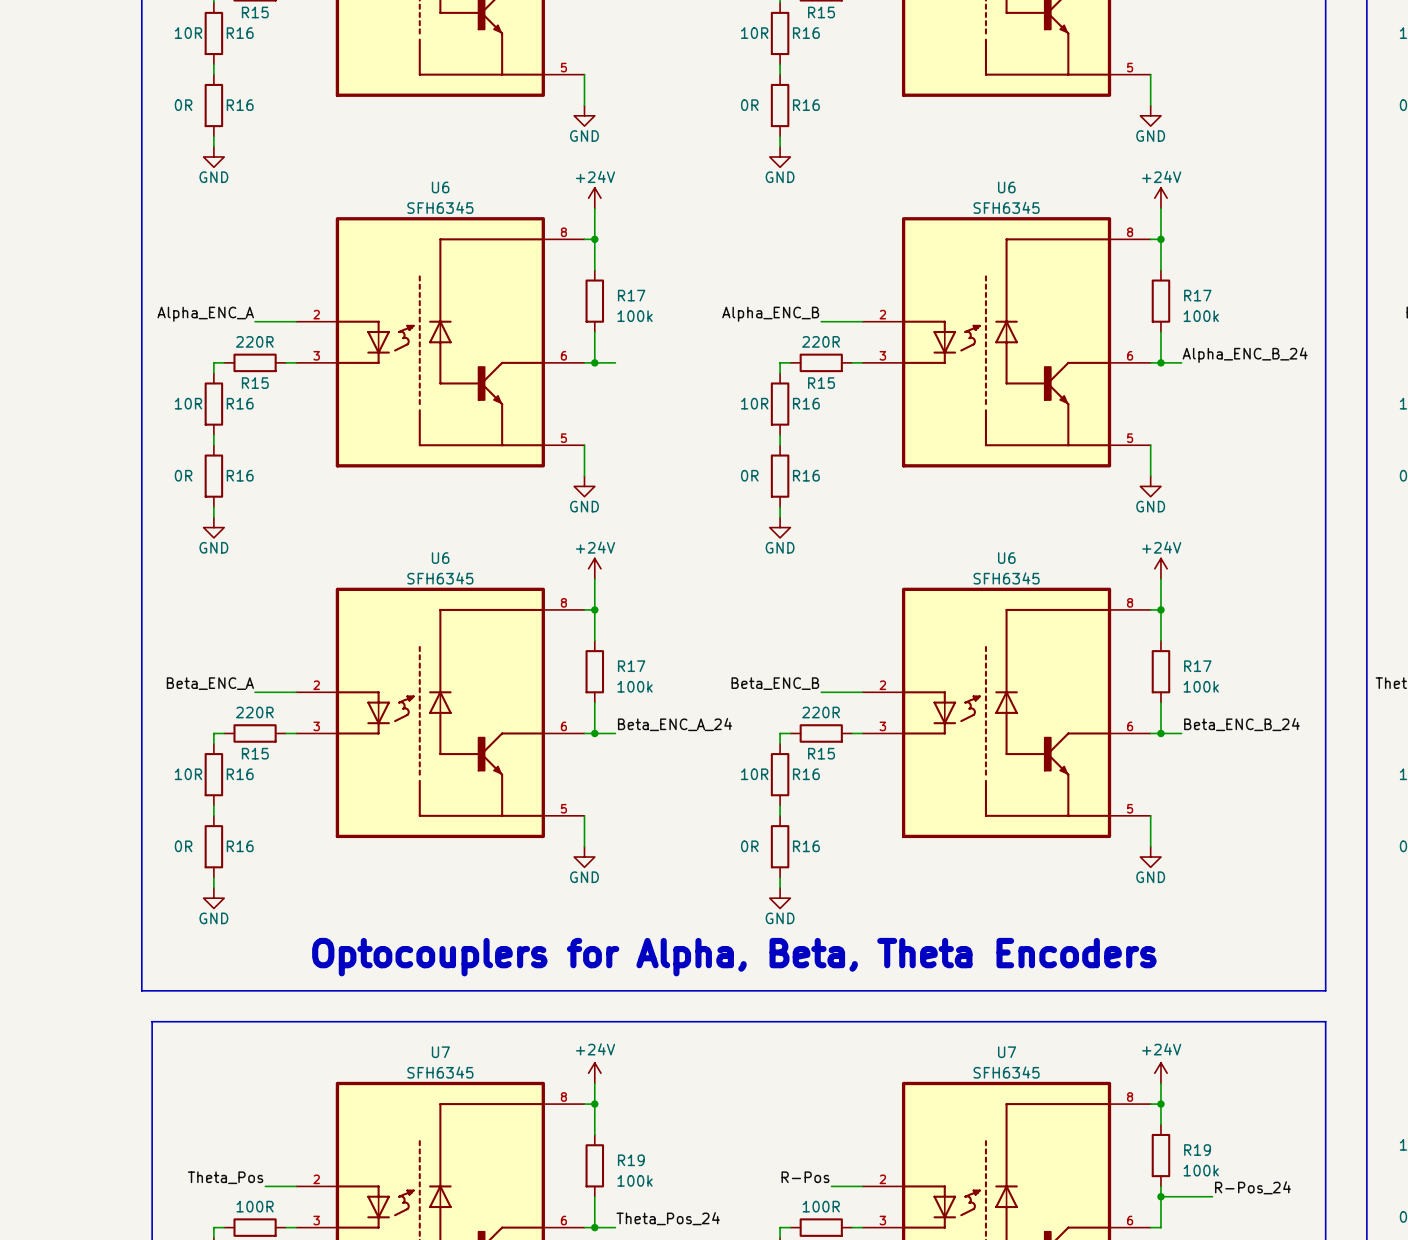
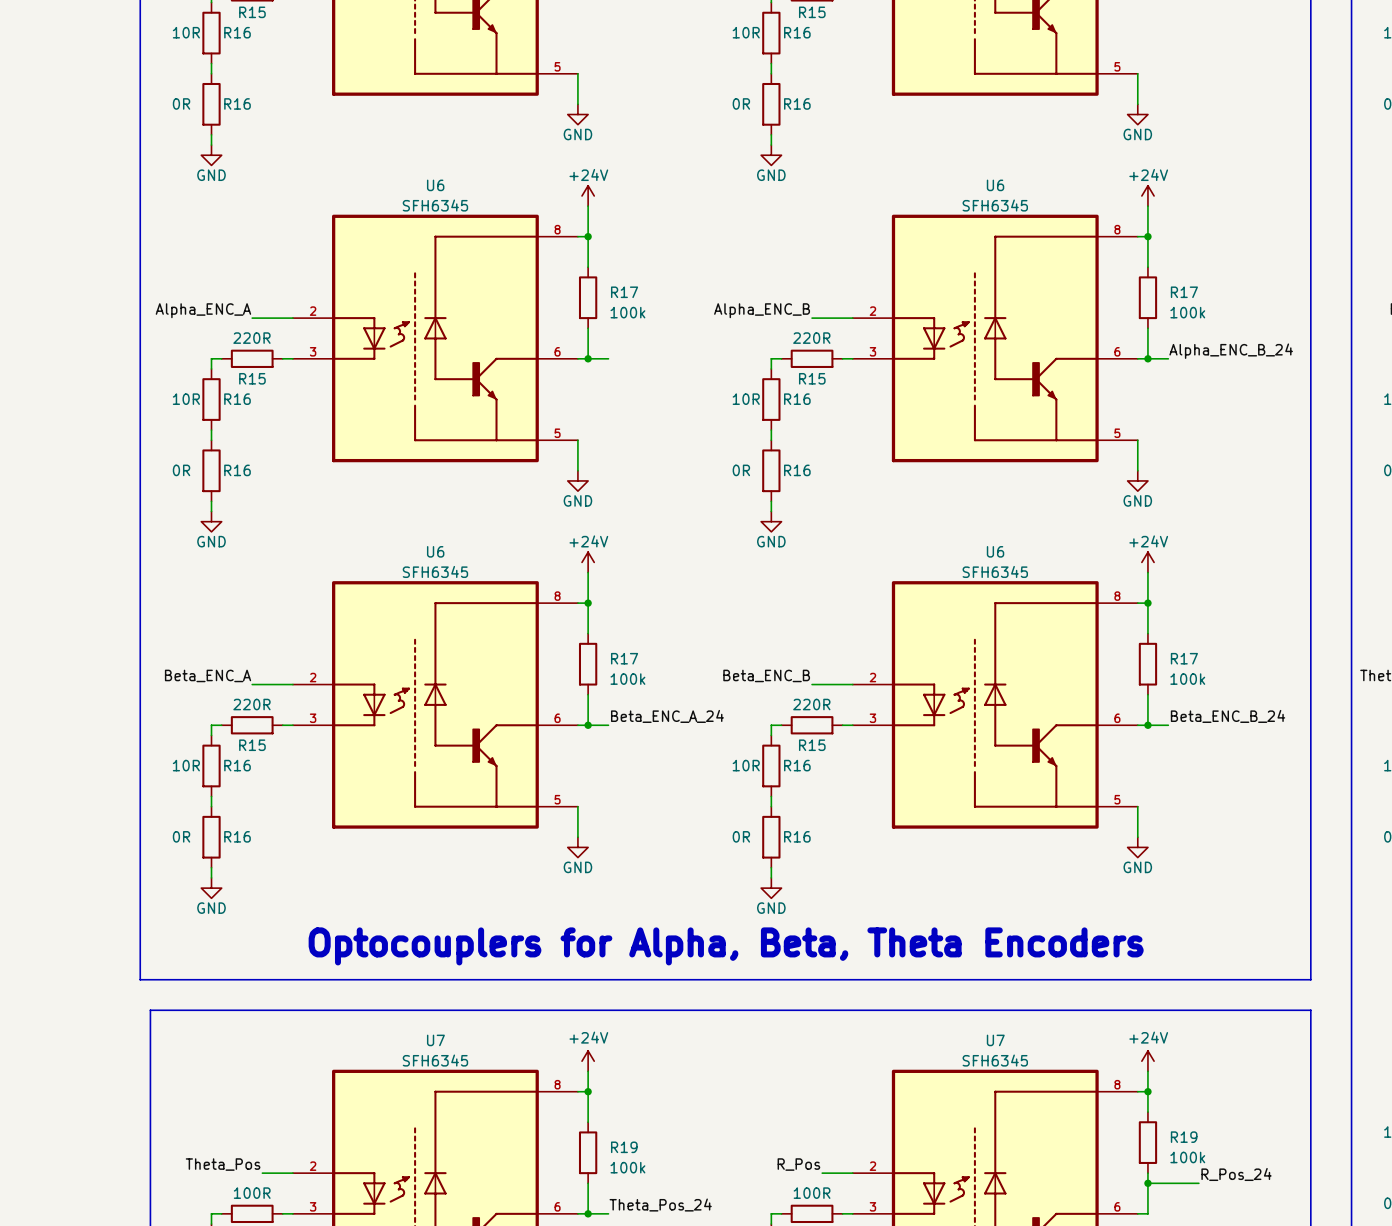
label: R-Pos (805, 1177) -> R_Pos (798, 1164)
label: R-Pos_24 (1252, 1187) -> R_Pos_24 (1236, 1174)

